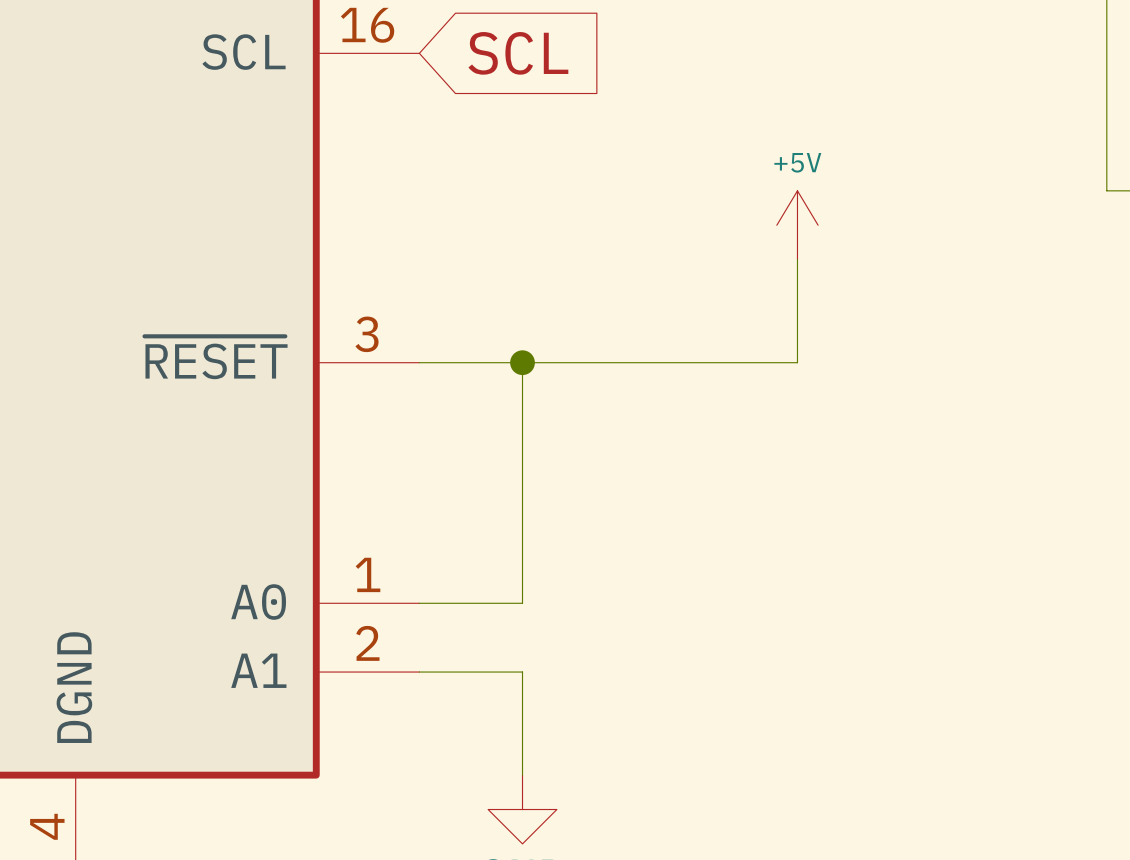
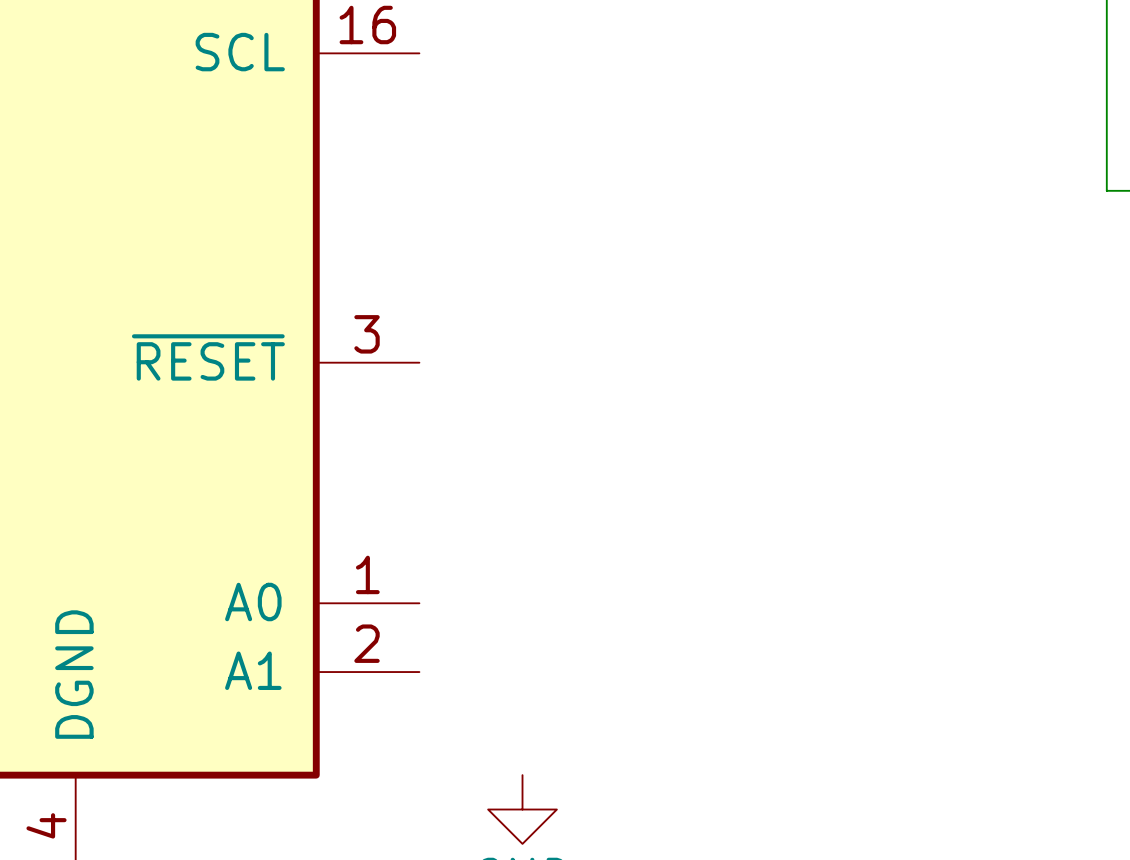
global label: SCL (518, 53) -> none
power symbol: +5V (797, 225) -> none
wire: (797, 259) (797, 362) (419, 362) -> none
wire: (522, 362) (522, 603) (419, 603) -> none
junction: (522, 362) -> none
wire: (419, 672) (522, 672) (522, 775) -> none

